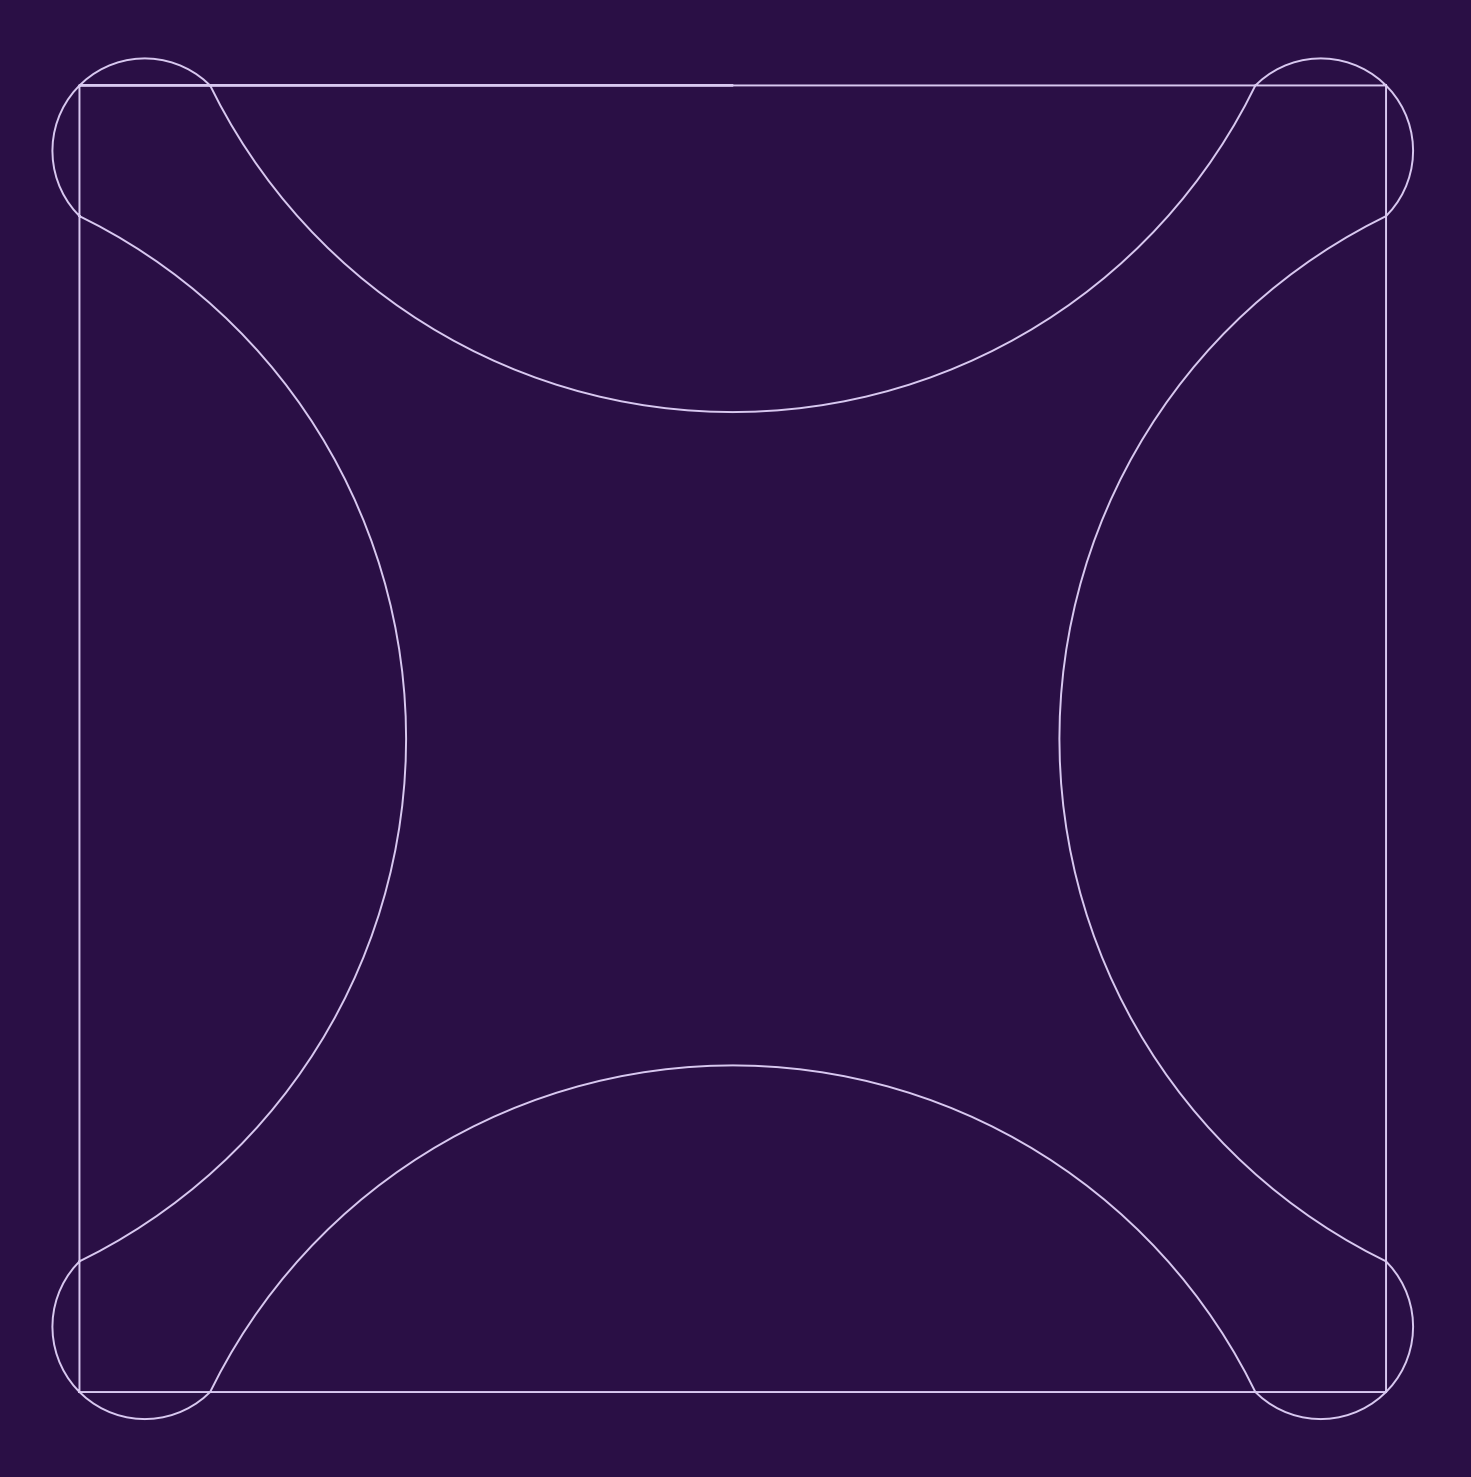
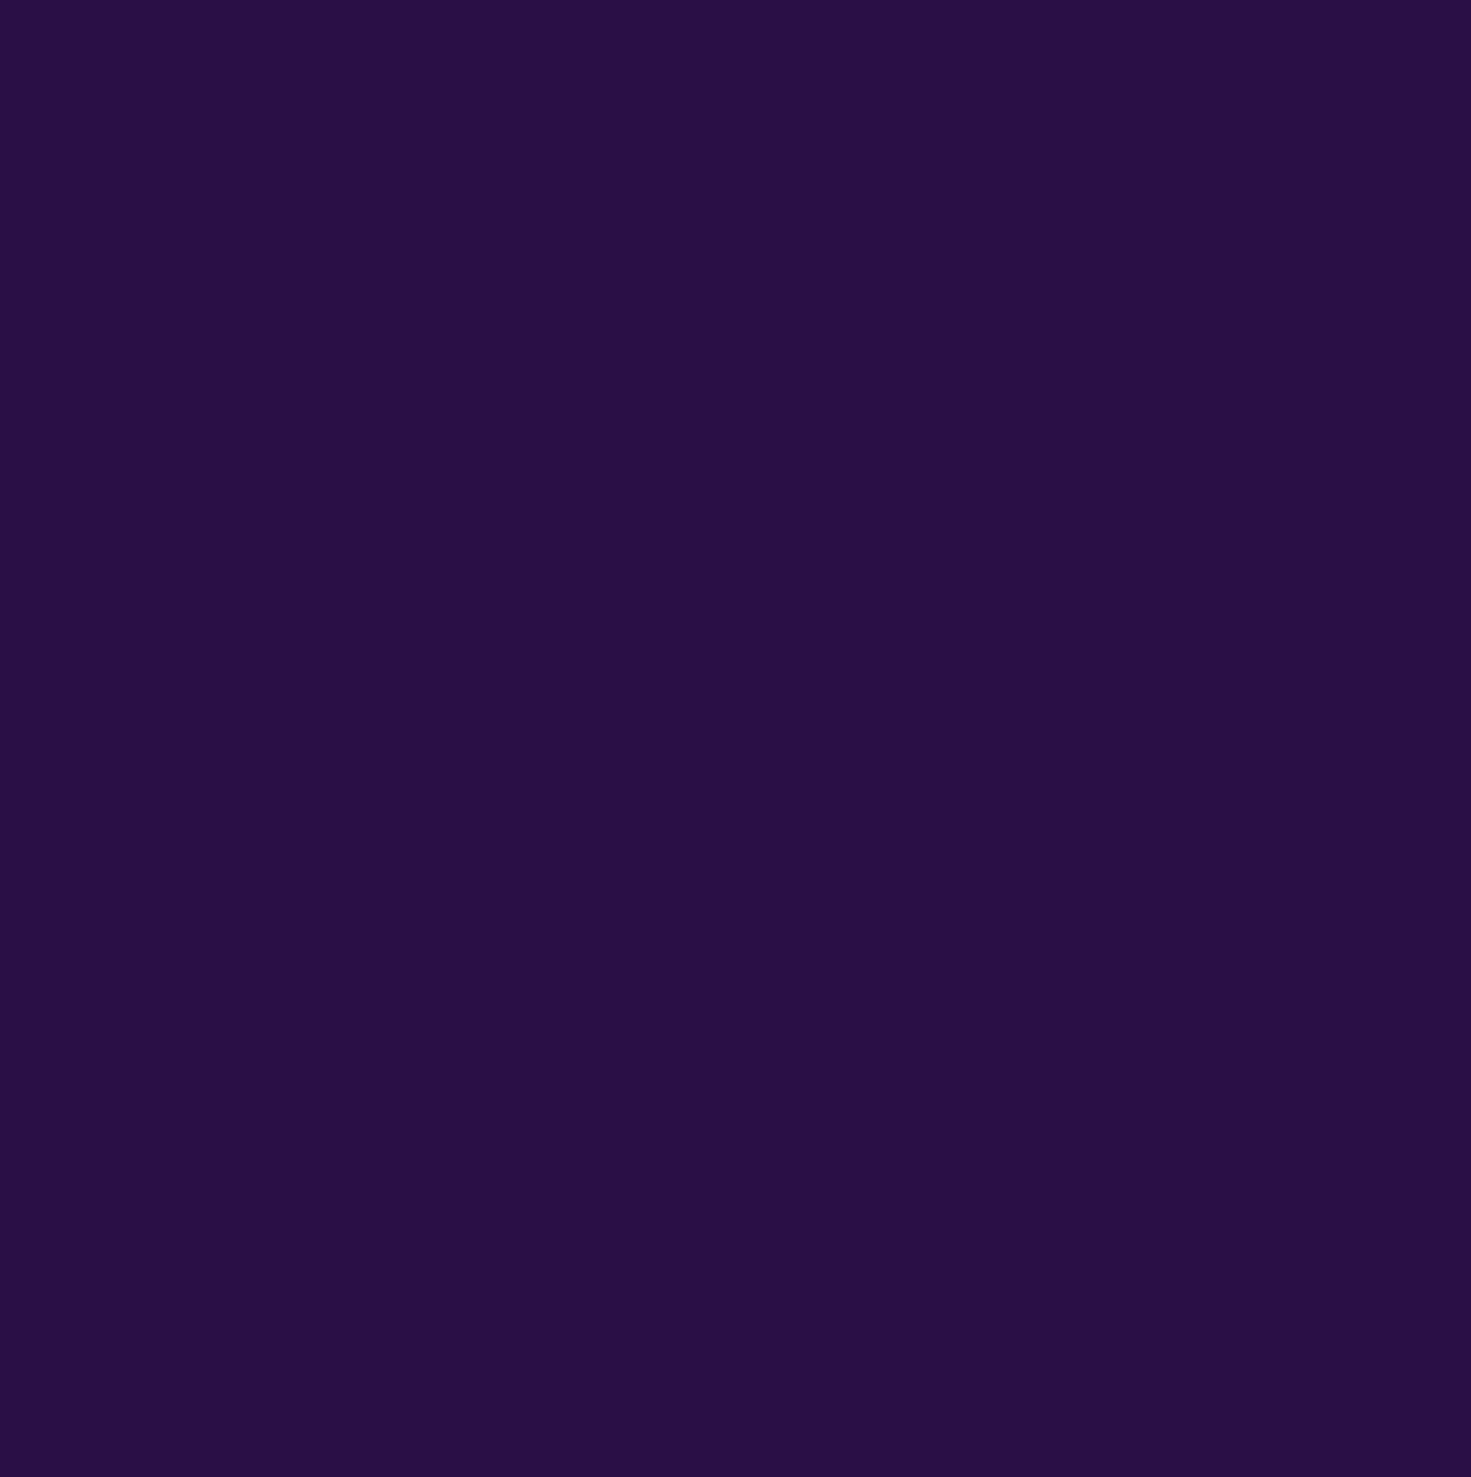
board edge: (1255, 85) (1269, 73) (1285, 65) (1311, 58) (1329, 58) (1347, 62) (1372, 73) (1386, 85) (1397, 99) (1409, 123) (1413, 150) (1409, 177) (1397, 202) (1386, 216) (1346, 237) (1308, 261) (1273, 288) (1223, 333) (1179, 384) (1153, 421) (1130, 459) (1110, 499) (1094, 541) (1080, 583) (1070, 627) (1063, 671) (1059, 716) (1059, 761) (1063, 805) (1074, 871) (1086, 914) (1101, 957) (1130, 1017) (1166, 1074) (1208, 1127) (1255, 1174) (1290, 1202) (1327, 1228) (1385, 1261) -> none
board edge: (1255, 85) (1222, 144) (1196, 180) (1168, 215) (1121, 263) (1068, 305) (1011, 340) (951, 369) (908, 384) (865, 396) (799, 408) (755, 411) (710, 411) (665, 408) (621, 401) (577, 391) (535, 377) (493, 360) (453, 340) (415, 317) (378, 291) (327, 247) (282, 198) (255, 162) (231, 124) (210, 85) (196, 73) (171, 62) (144, 58) (117, 62) (93, 73) (79, 85) (67, 99) (56, 123) (52, 141) (52, 159) (59, 186) (67, 202) (79, 216) -> none
board edge: (1386, 85) (79, 85) (79, 1392) (1386, 1392) (1386, 85) -> none
board edge: (79, 216) (138, 249) (174, 274) (209, 302) (257, 350) (299, 402) (334, 459) (363, 520) (378, 562) (390, 605) (402, 671) (405, 716) (405, 761) (402, 805) (395, 850) (385, 893) (371, 936) (354, 977) (334, 1017) (311, 1056) (285, 1092) (241, 1143) (192, 1189) (156, 1216) (118, 1240) (79, 1261) (67, 1275) (56, 1299) (52, 1326) (56, 1353) (67, 1378) (79, 1392) (93, 1403) (117, 1415) (135, 1418) (153, 1418) (180, 1412) (196, 1403) (210, 1392) -> none
board edge: (1386, 1261) (1397, 1275) (1406, 1291) (1412, 1317) (1412, 1335) (1409, 1353) (1397, 1378) (1386, 1392) (1372, 1403) (1347, 1415) (1320, 1419) (1293, 1415) (1269, 1403) (1255, 1392) (1234, 1352) (1210, 1314) (1183, 1279) (1137, 1229) (1086, 1185) (1050, 1159) (1011, 1136) (971, 1116) (930, 1100) (887, 1086) (844, 1076) (799, 1069) (755, 1065) (710, 1065) (665, 1069) (599, 1080) (556, 1092) (514, 1107) (453, 1136) (396, 1172) (344, 1214) (297, 1261) (268, 1296) (243, 1333) (210, 1391) -> none

